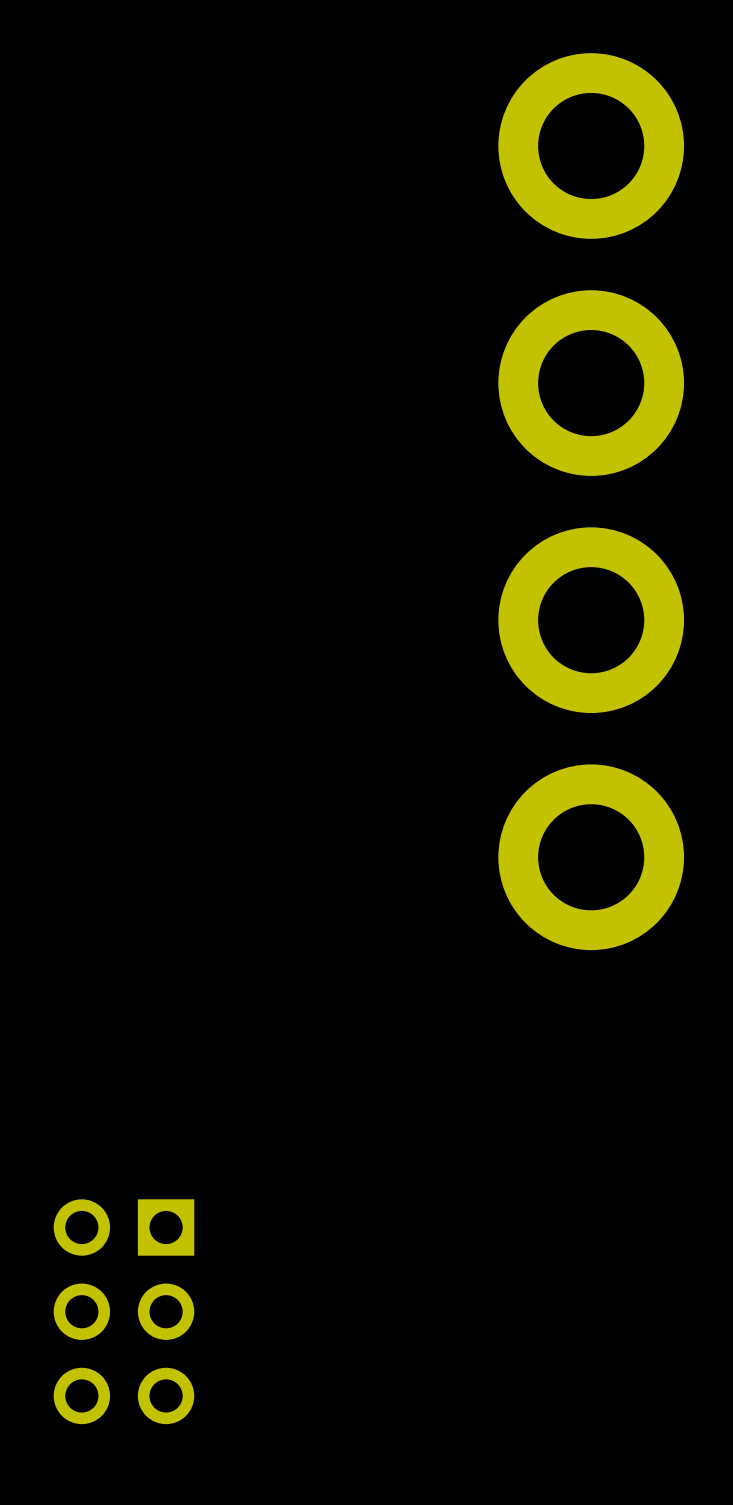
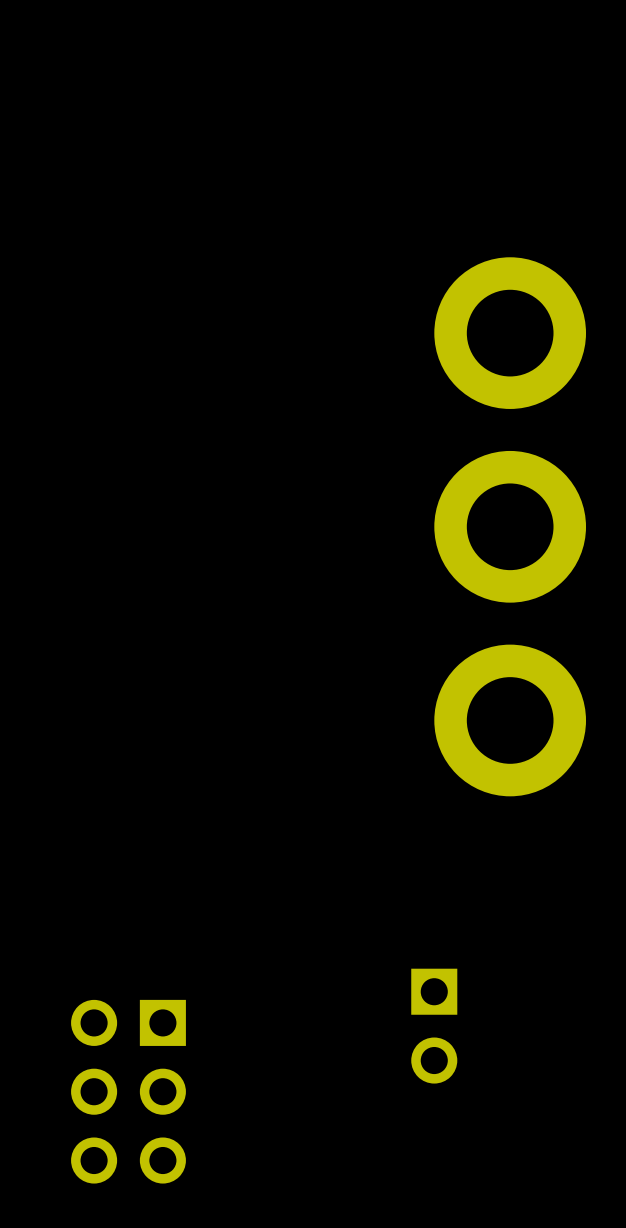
part: (591, 146) -> none
part: none -> (434, 1026)

